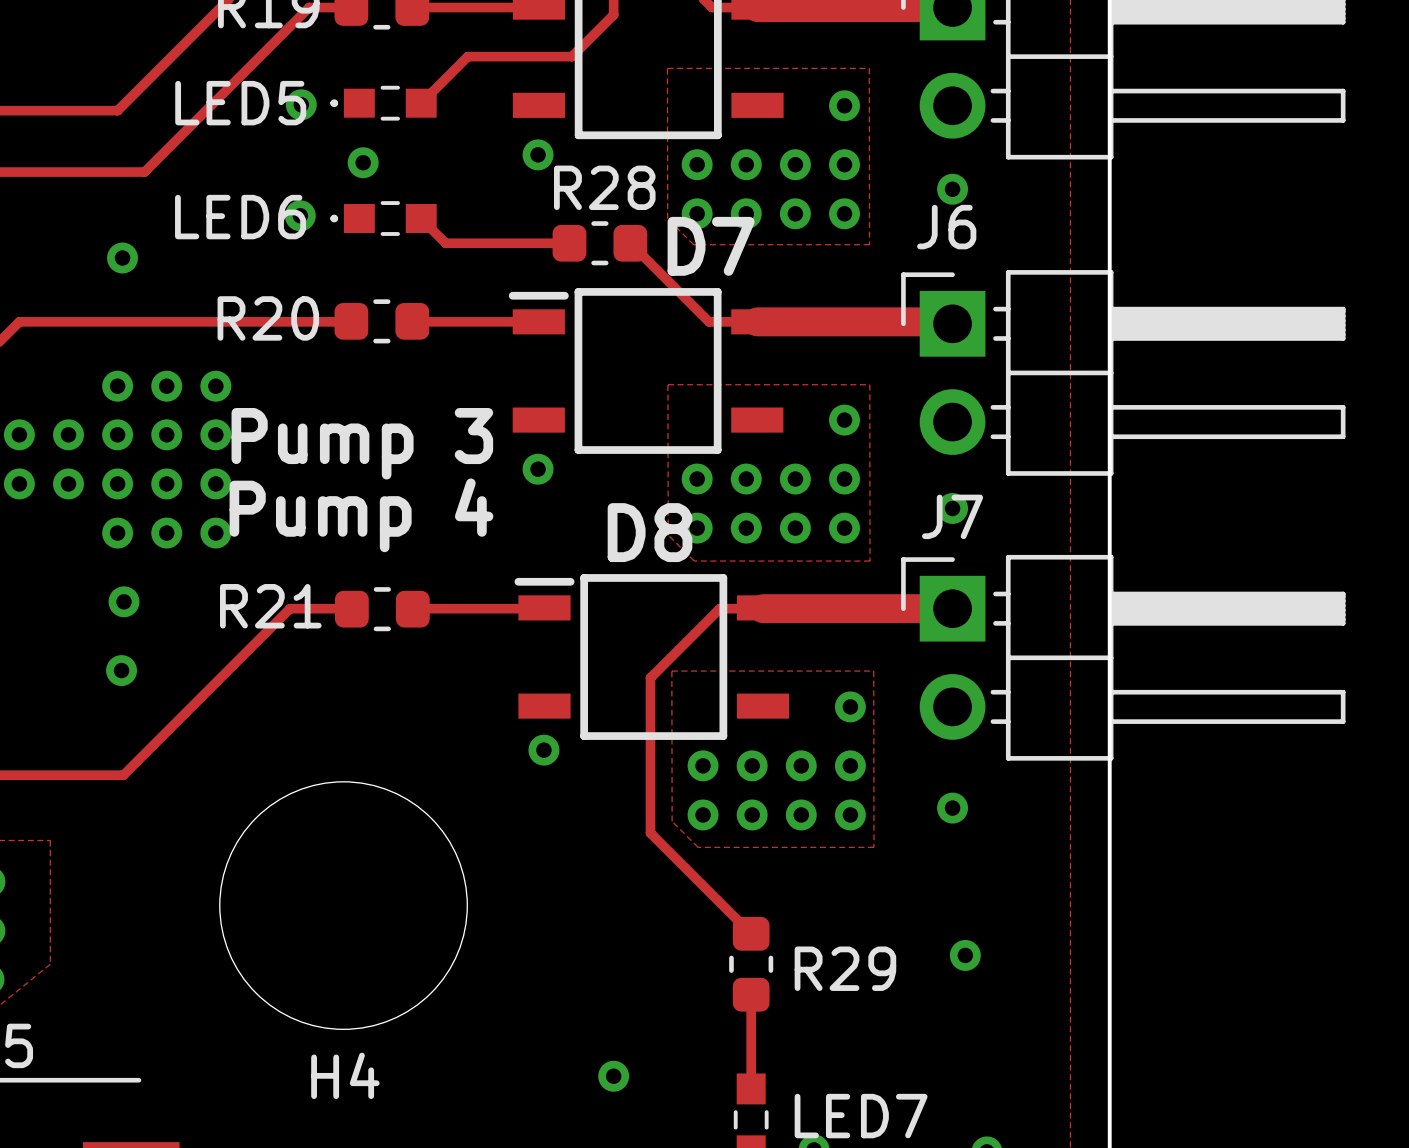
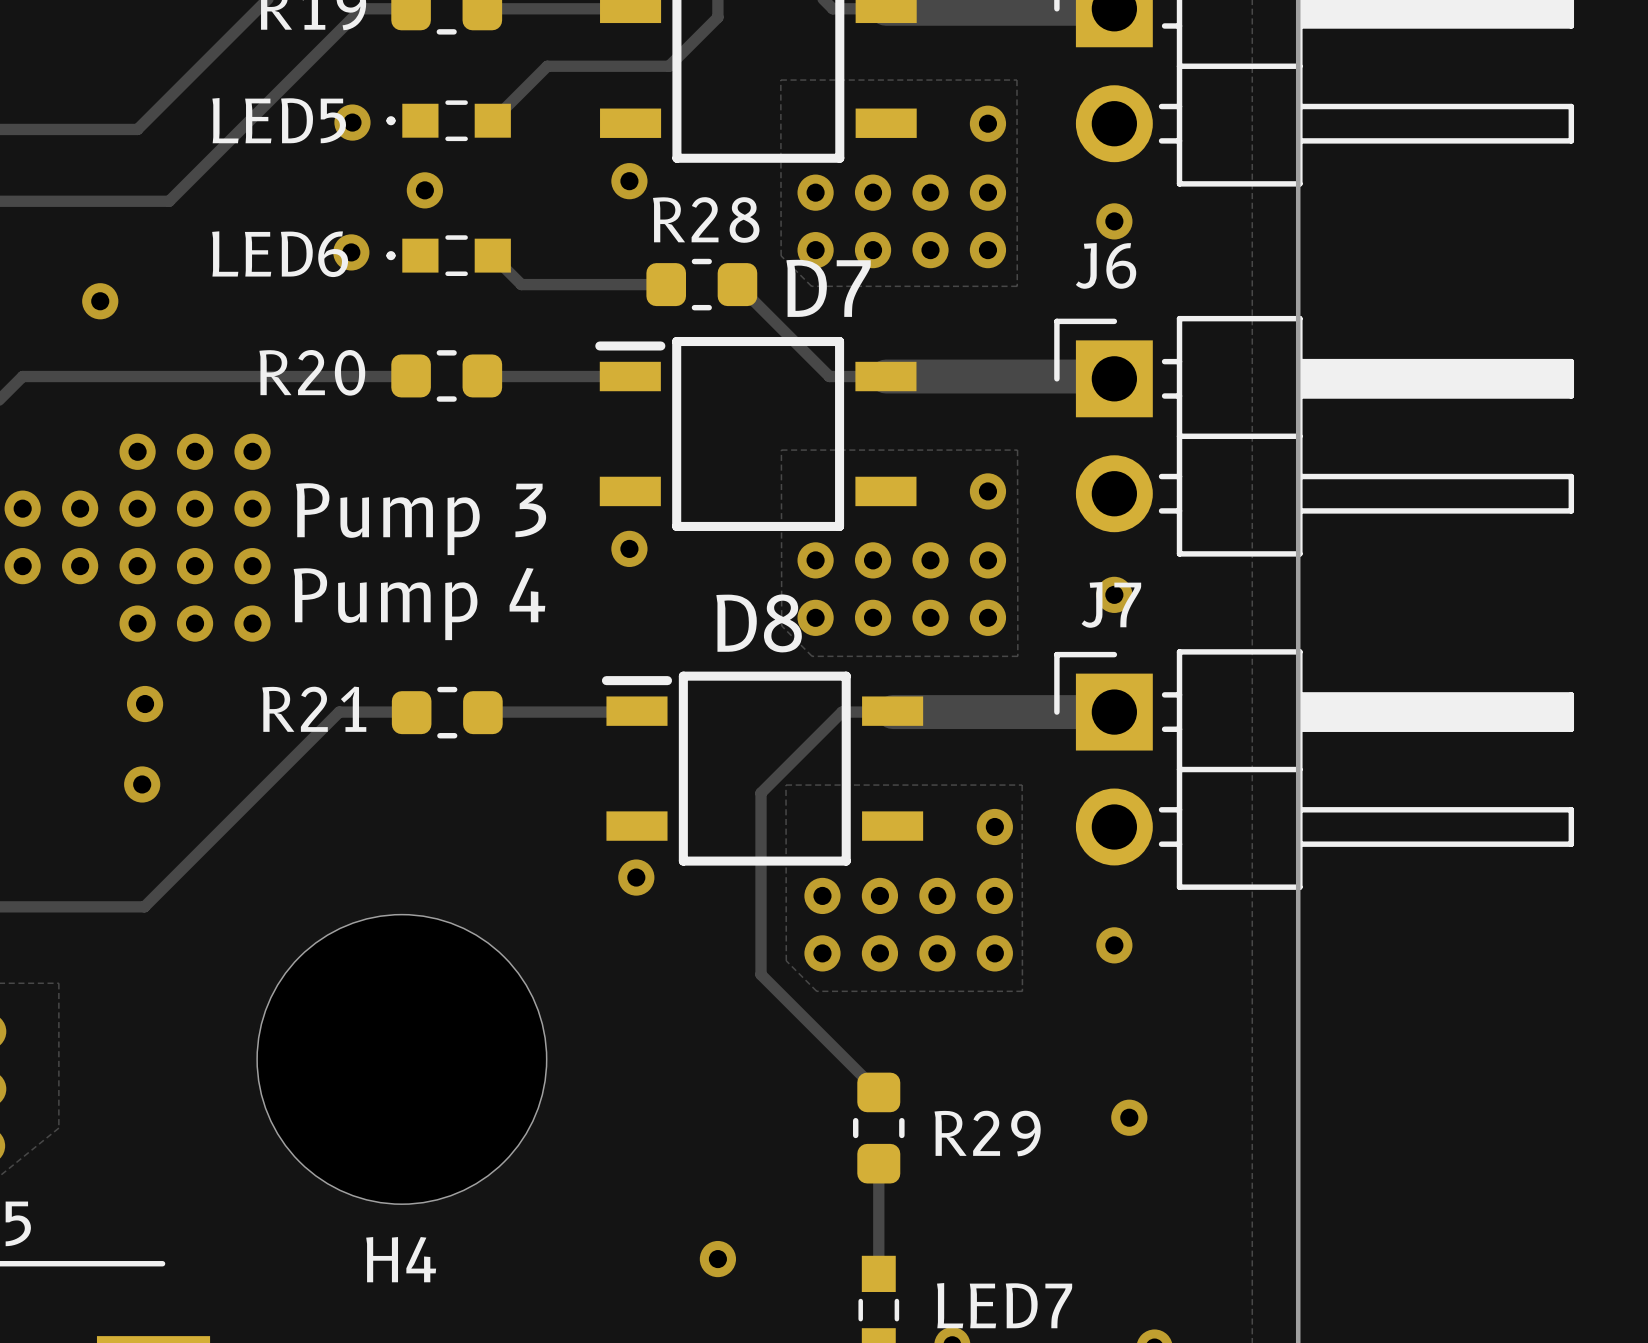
via position: (122, 258) -> (100, 301)

